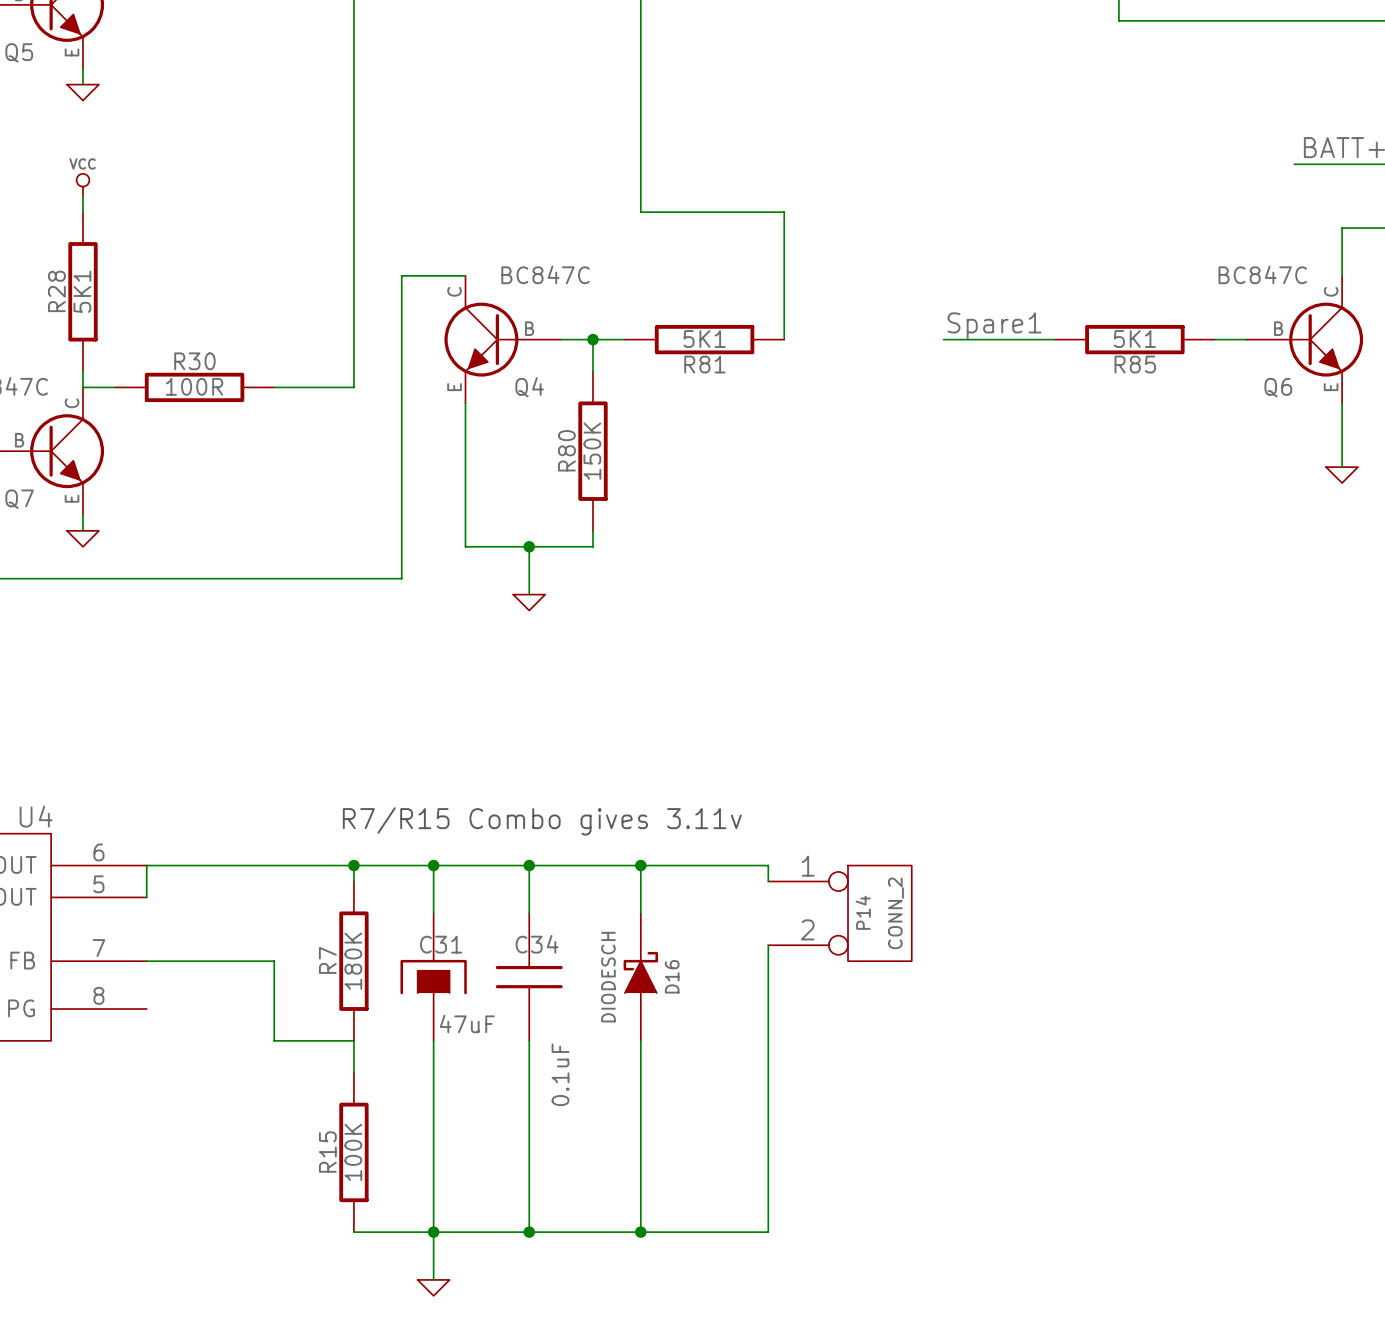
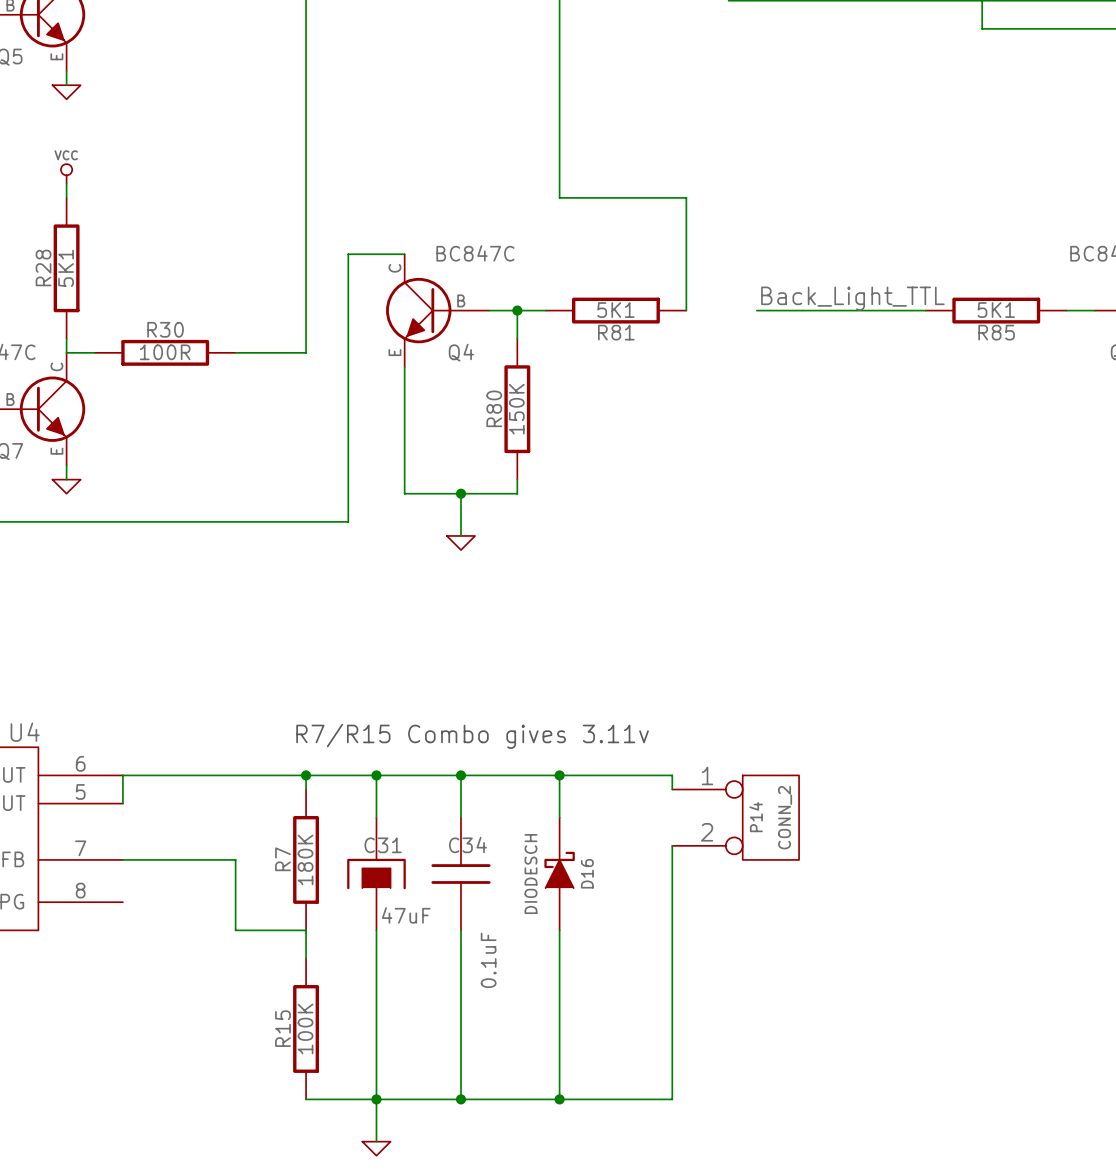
label: none -> Back_Light_TTL (852, 298)
label: Spare1 (994, 326) -> none
wire: none -> (756, 310) (827, 310)

